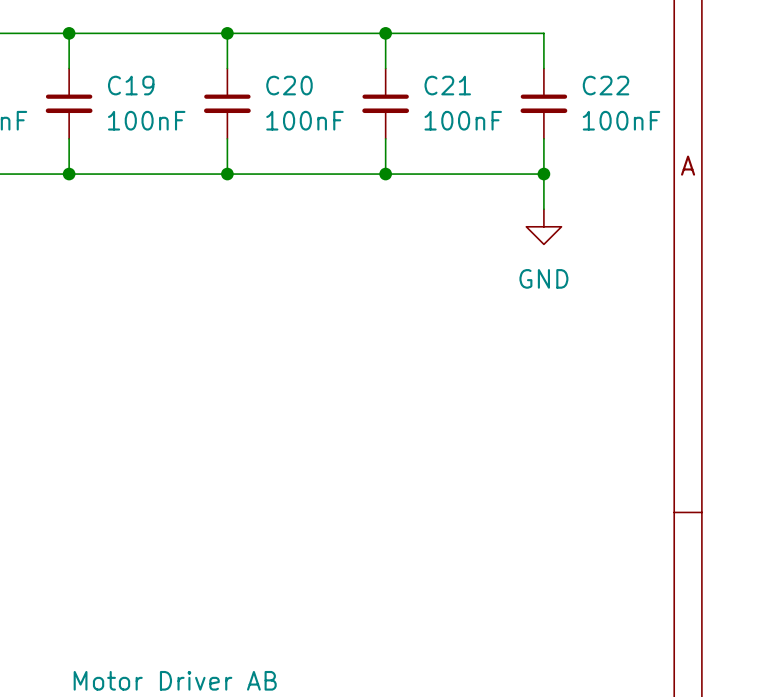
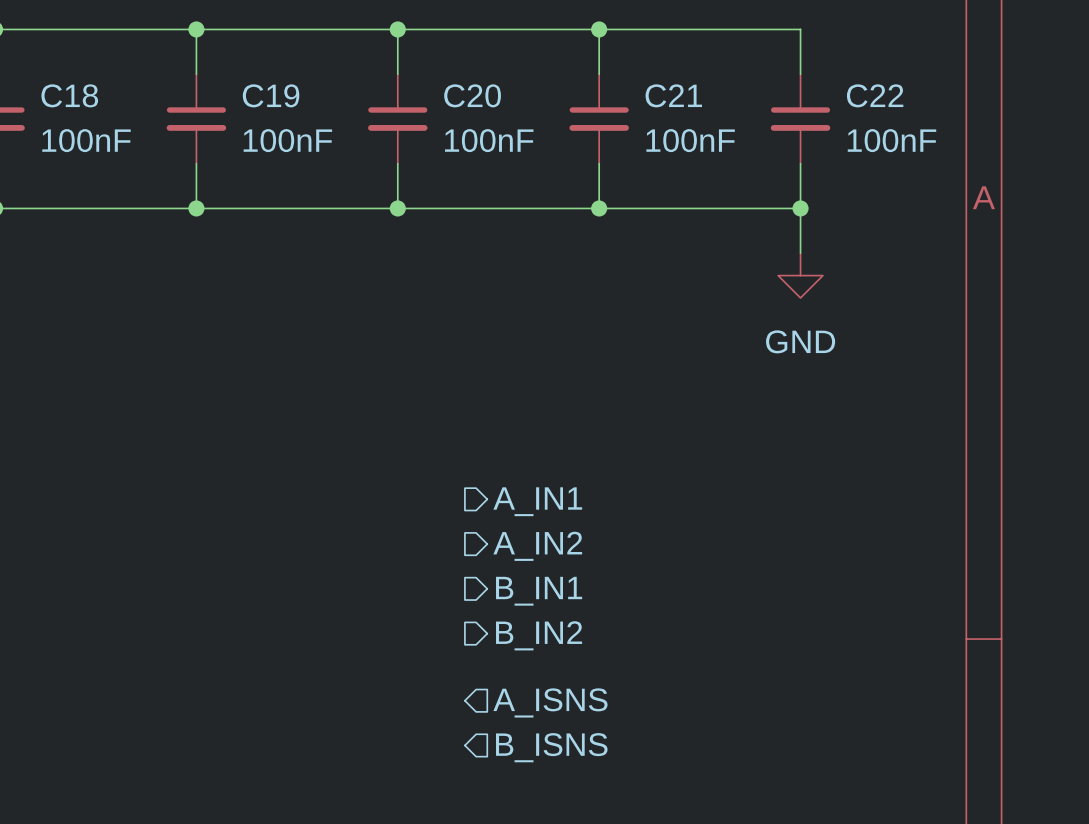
sheet pin: none -> A_IN1 (537, 501)
sheet pin: none -> A_IN2 (537, 546)
sheet pin: none -> B_IN1 (539, 591)
sheet pin: none -> B_IN2 (539, 635)
sheet pin: none -> A_ISNS (550, 702)
sheet pin: none -> B_ISNS (551, 747)

